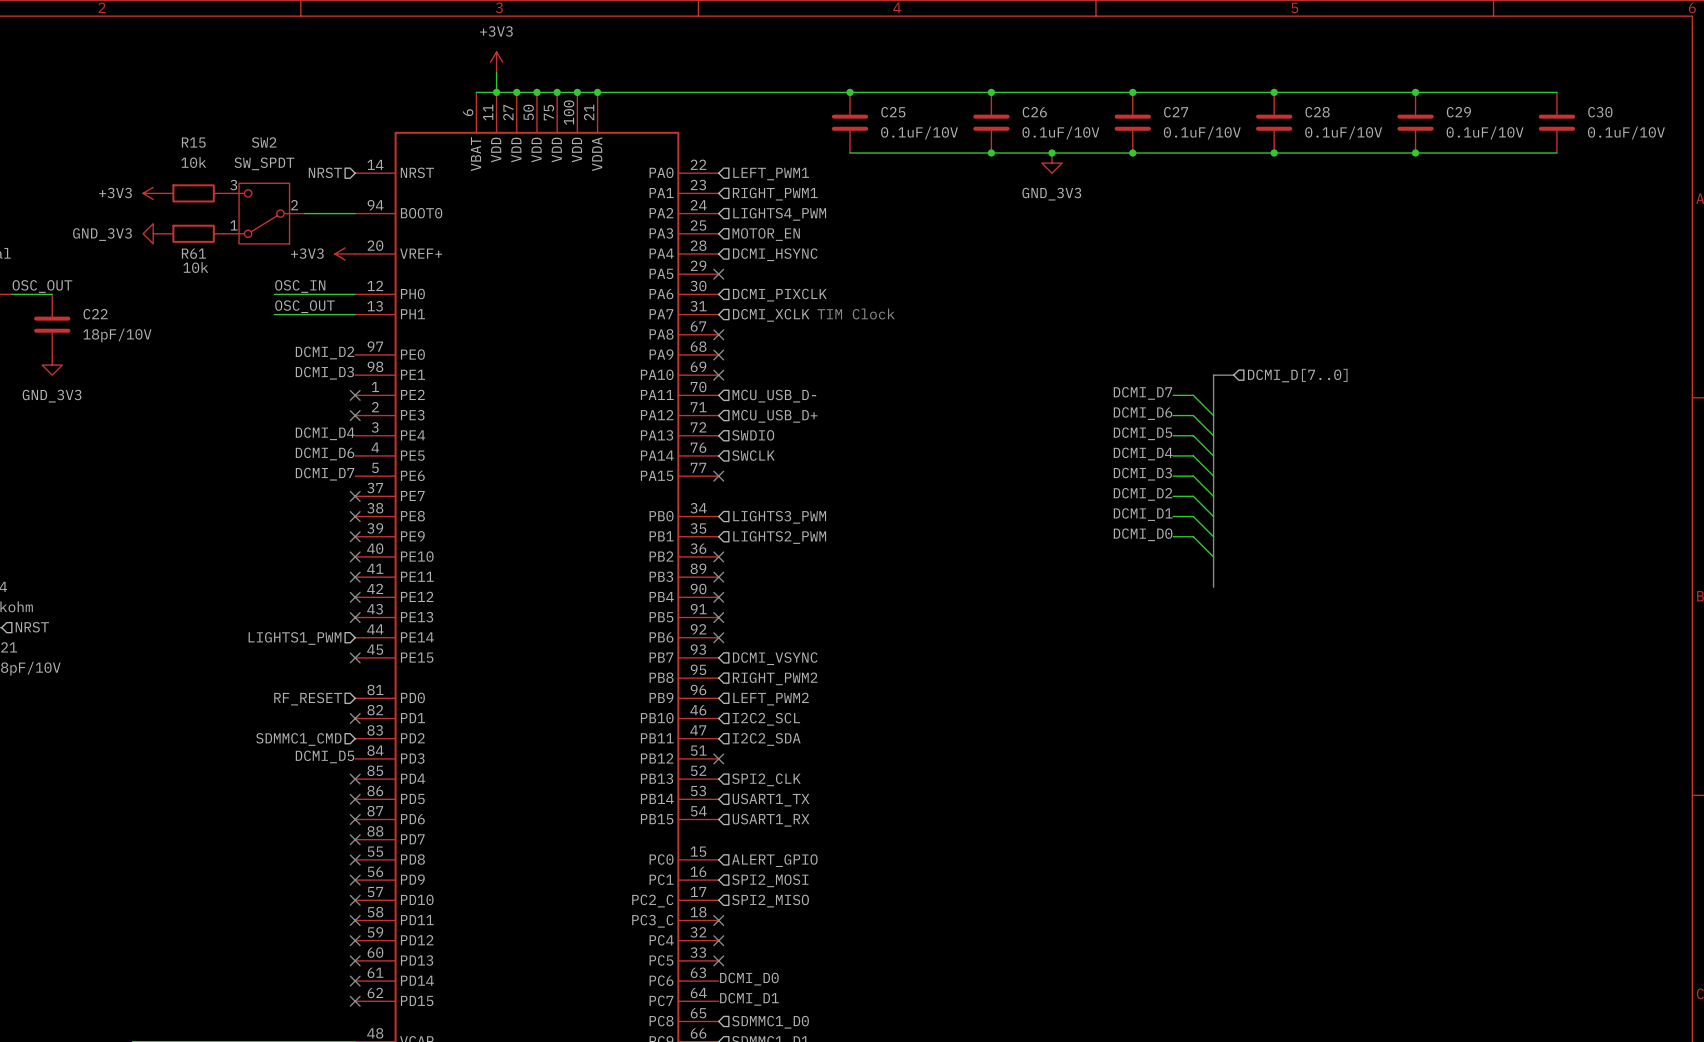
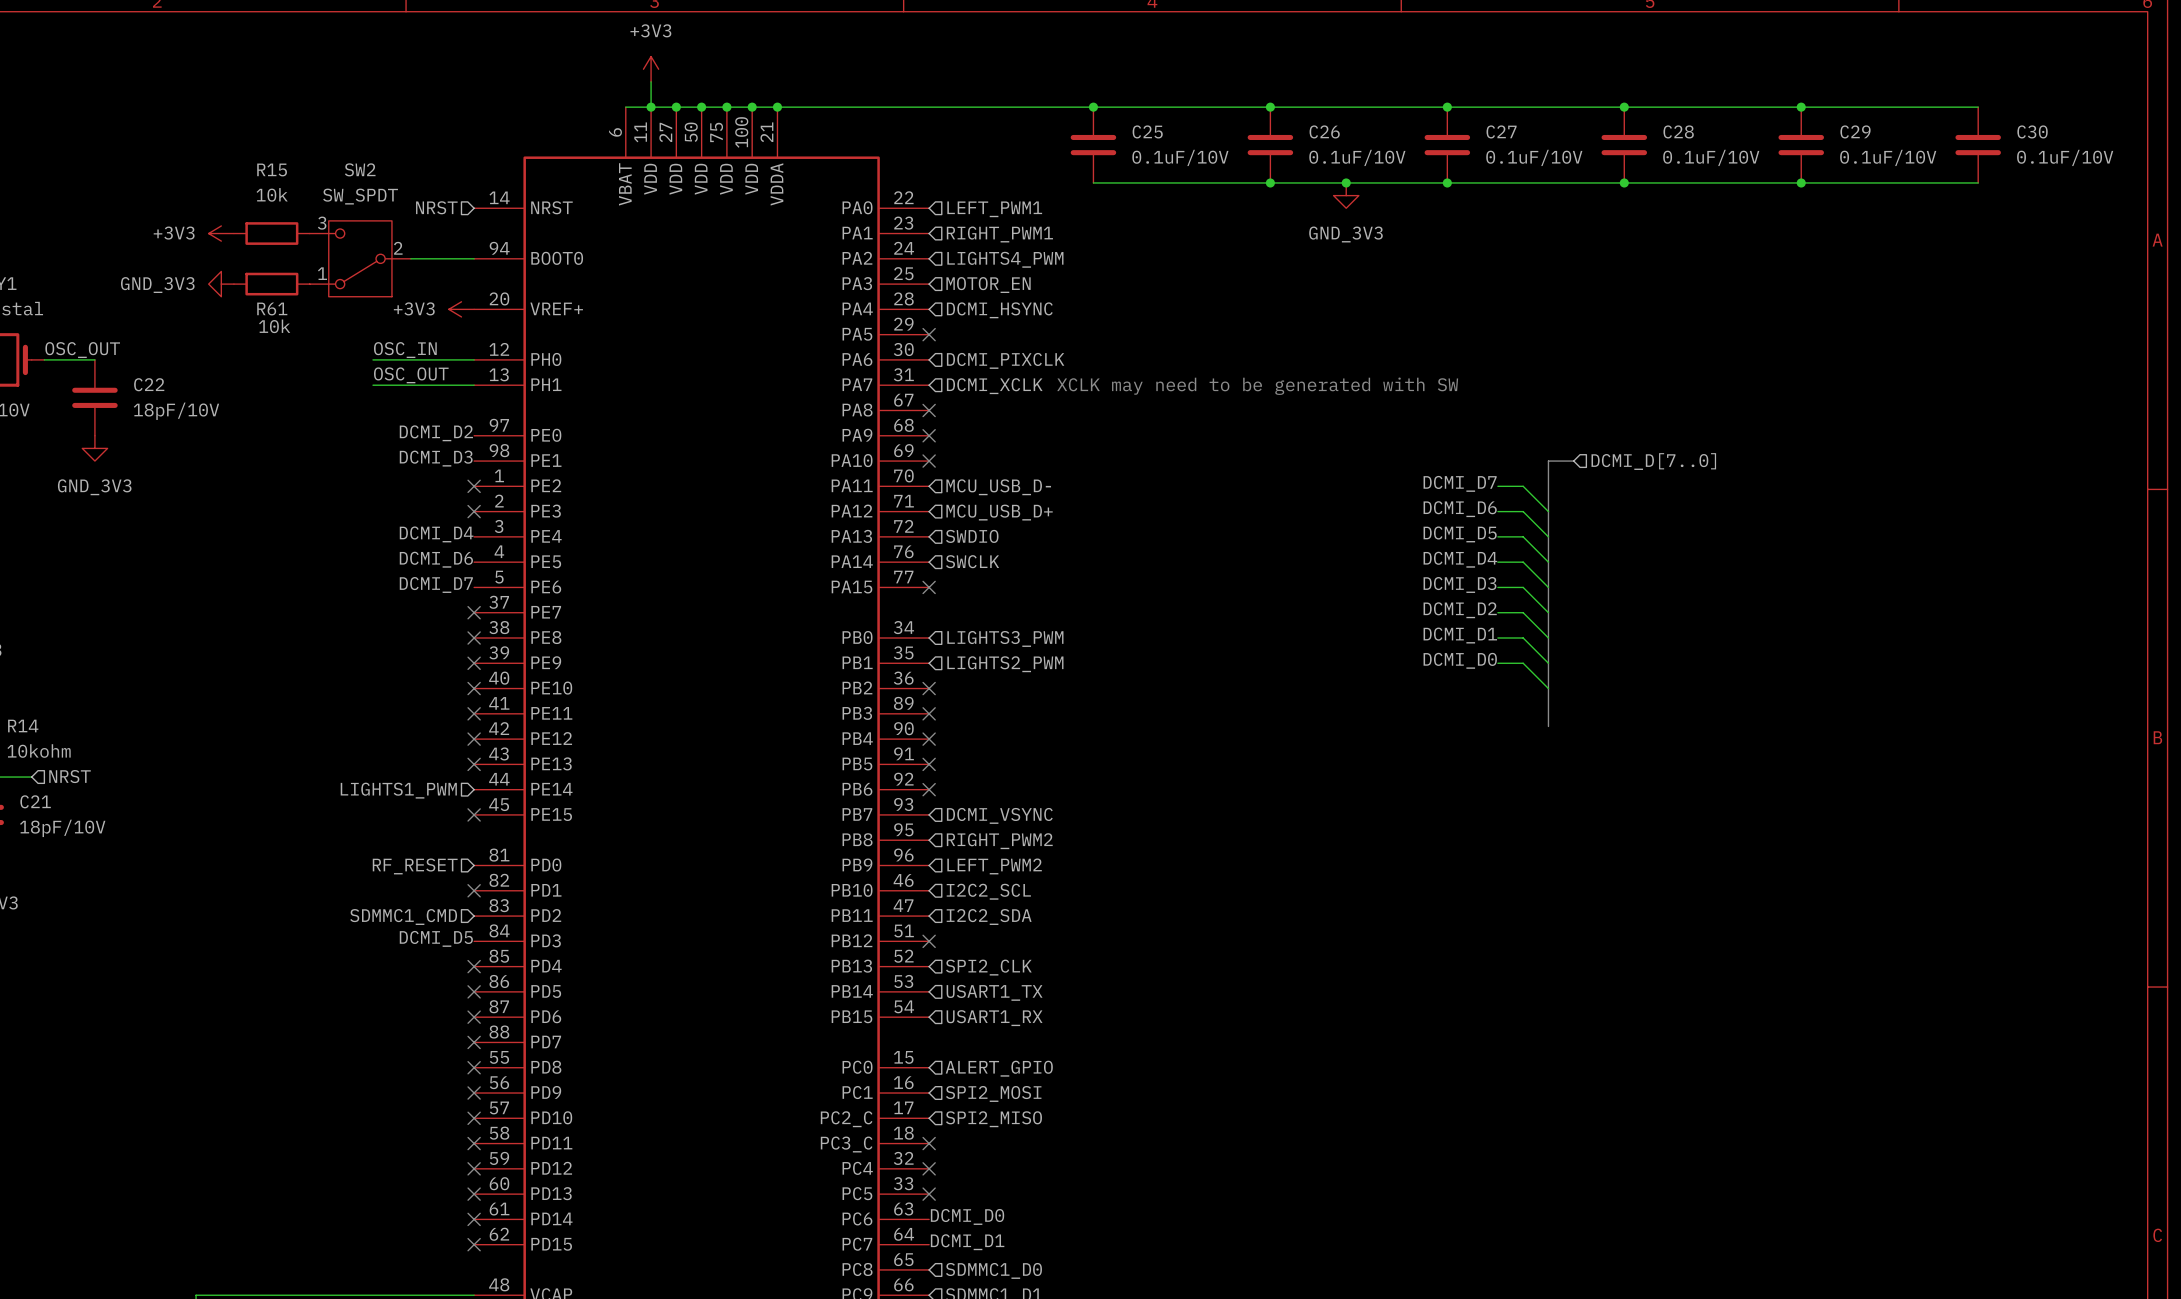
text: TIM Clock (856, 314) -> none
text: none -> XCLK may need to be generated with SW (1257, 386)

